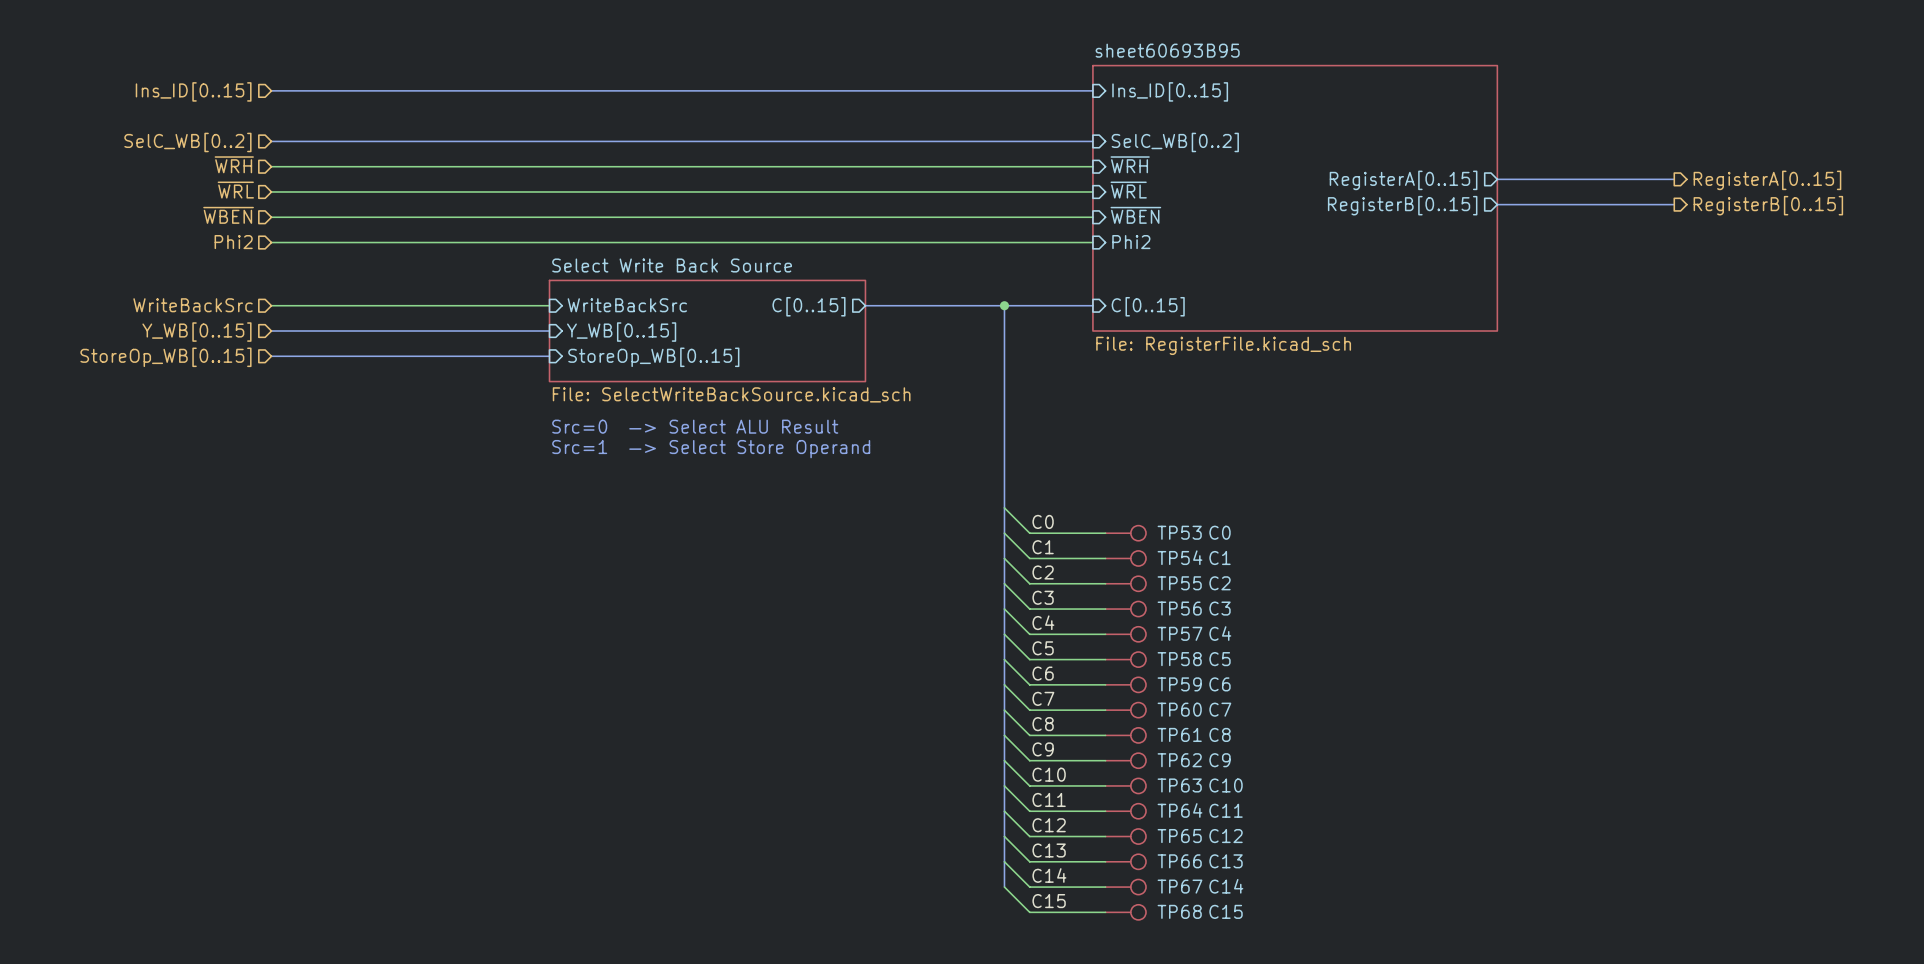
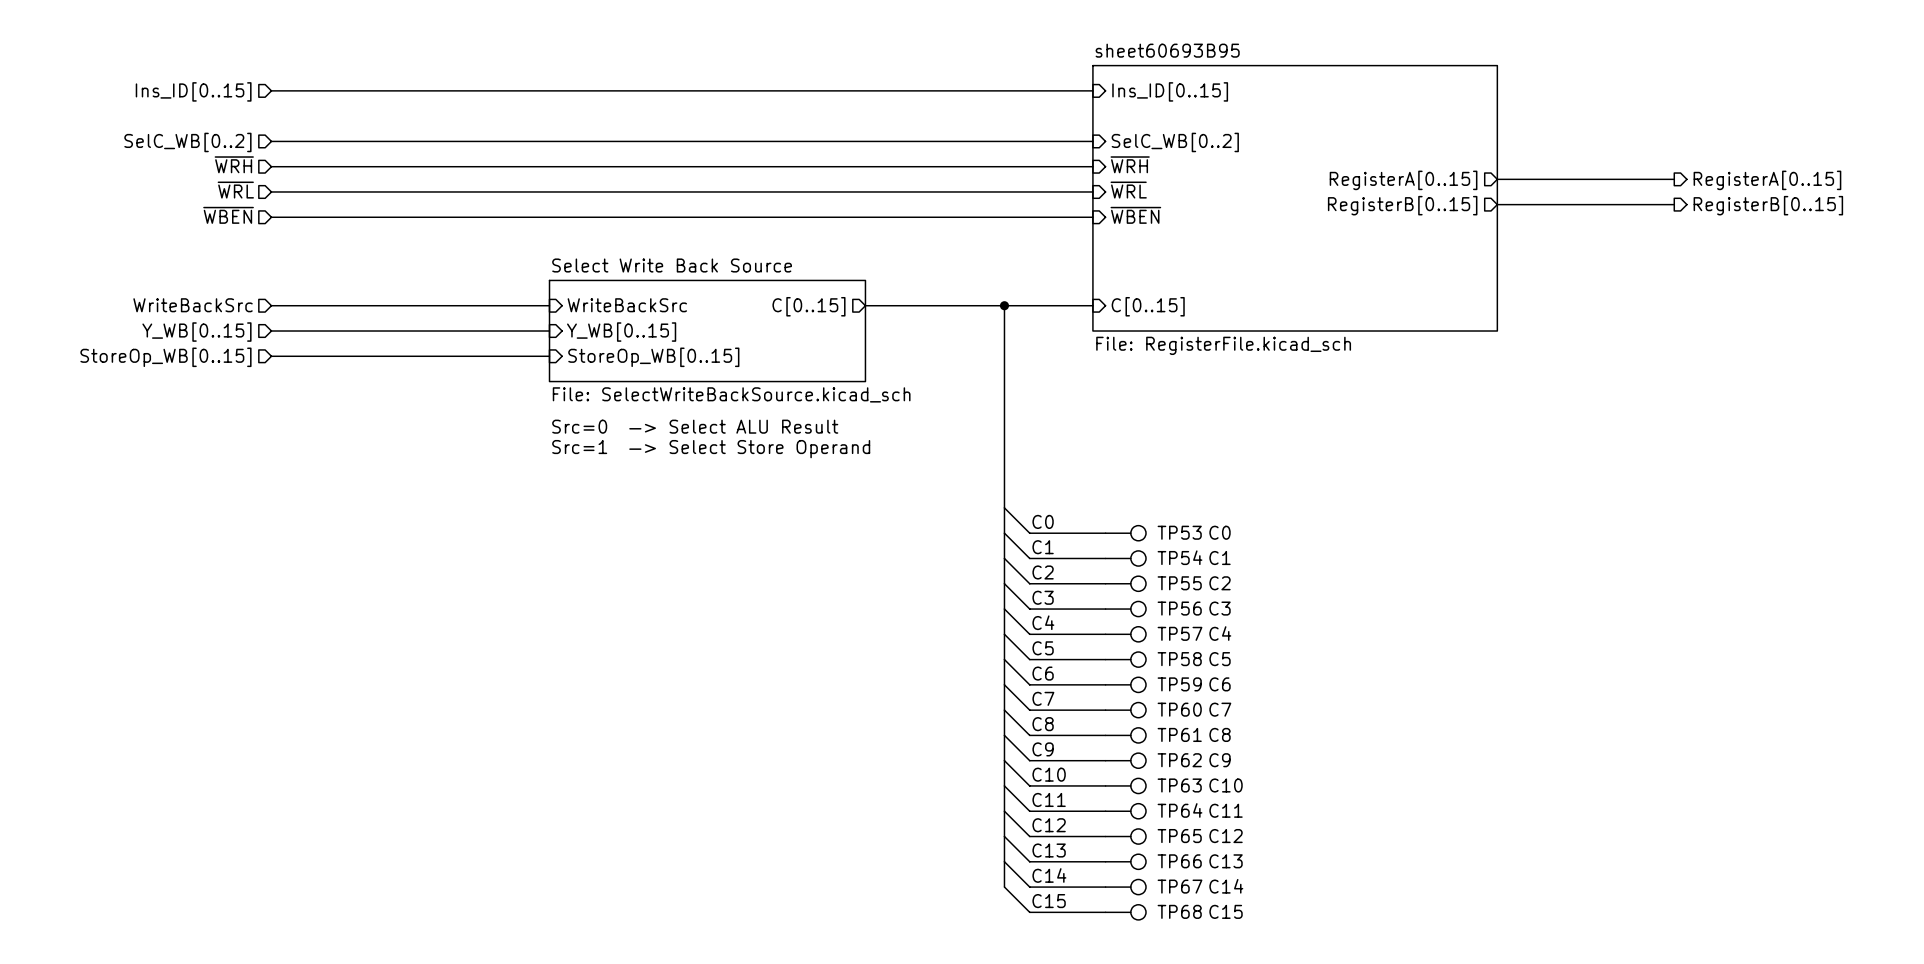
hierarchical label: Phi2 (233, 242) -> none
wire: (271, 242) (1092, 242) -> none
sheet pin: Phi2 (1131, 242) -> none

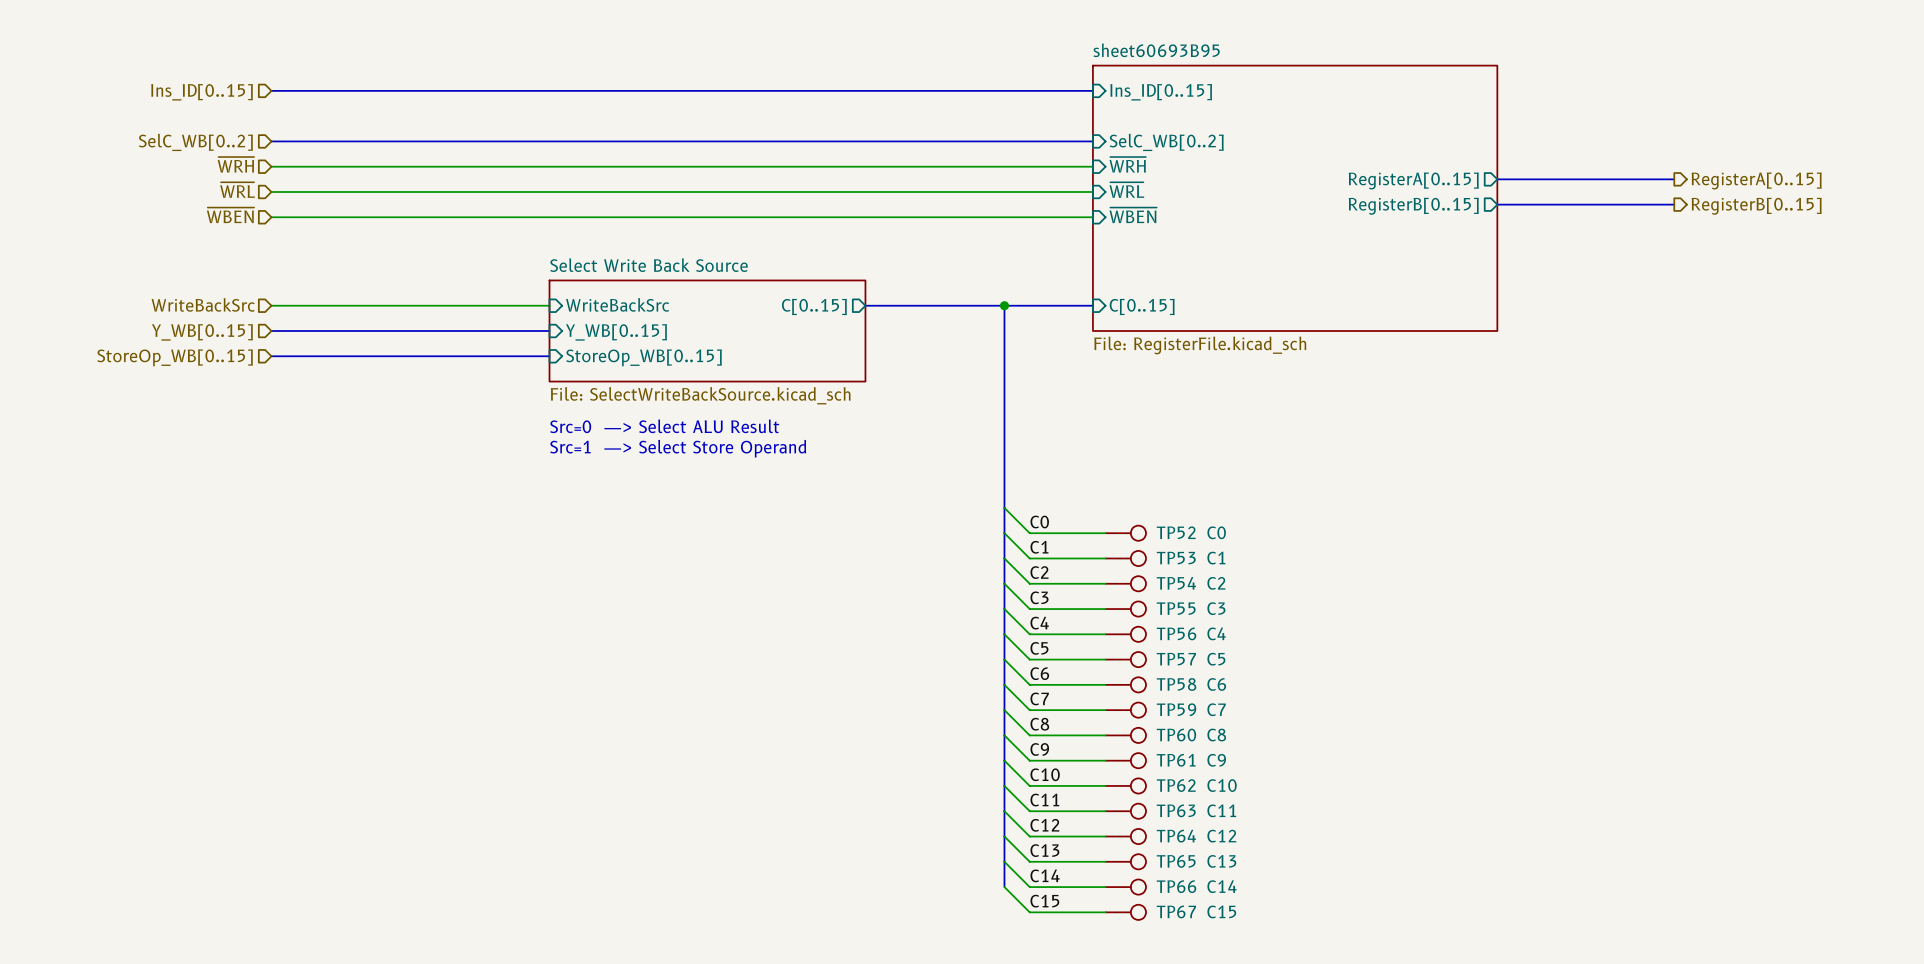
TP53 name: TP53 (1179, 532) -> TP52 (1176, 532)
TP54 name: TP54 (1179, 557) -> TP53 (1176, 558)
TP55 name: TP55 (1179, 583) -> TP54 (1176, 583)
TP56 name: TP56 (1179, 608) -> TP55 (1176, 608)
TP57 name: TP57 (1179, 633) -> TP56 (1176, 633)
TP58 name: TP58 (1179, 659) -> TP57 (1176, 659)
TP59 name: TP59 (1179, 684) -> TP58 (1176, 684)
TP60 name: TP60 (1179, 709) -> TP59 (1176, 709)
TP61 name: TP61 (1179, 734) -> TP60 (1176, 735)
TP62 name: TP62 (1179, 760) -> TP61 (1176, 760)
TP63 name: TP63 (1179, 785) -> TP62 (1176, 785)
TP64 name: TP64 (1179, 810) -> TP63 (1176, 810)
TP65 name: TP65 (1179, 836) -> TP64 (1176, 836)
TP66 name: TP66 (1179, 861) -> TP65 (1176, 861)
TP67 name: TP67 (1179, 886) -> TP66 (1176, 886)
TP68 name: TP68 (1179, 911) -> TP67 (1176, 911)

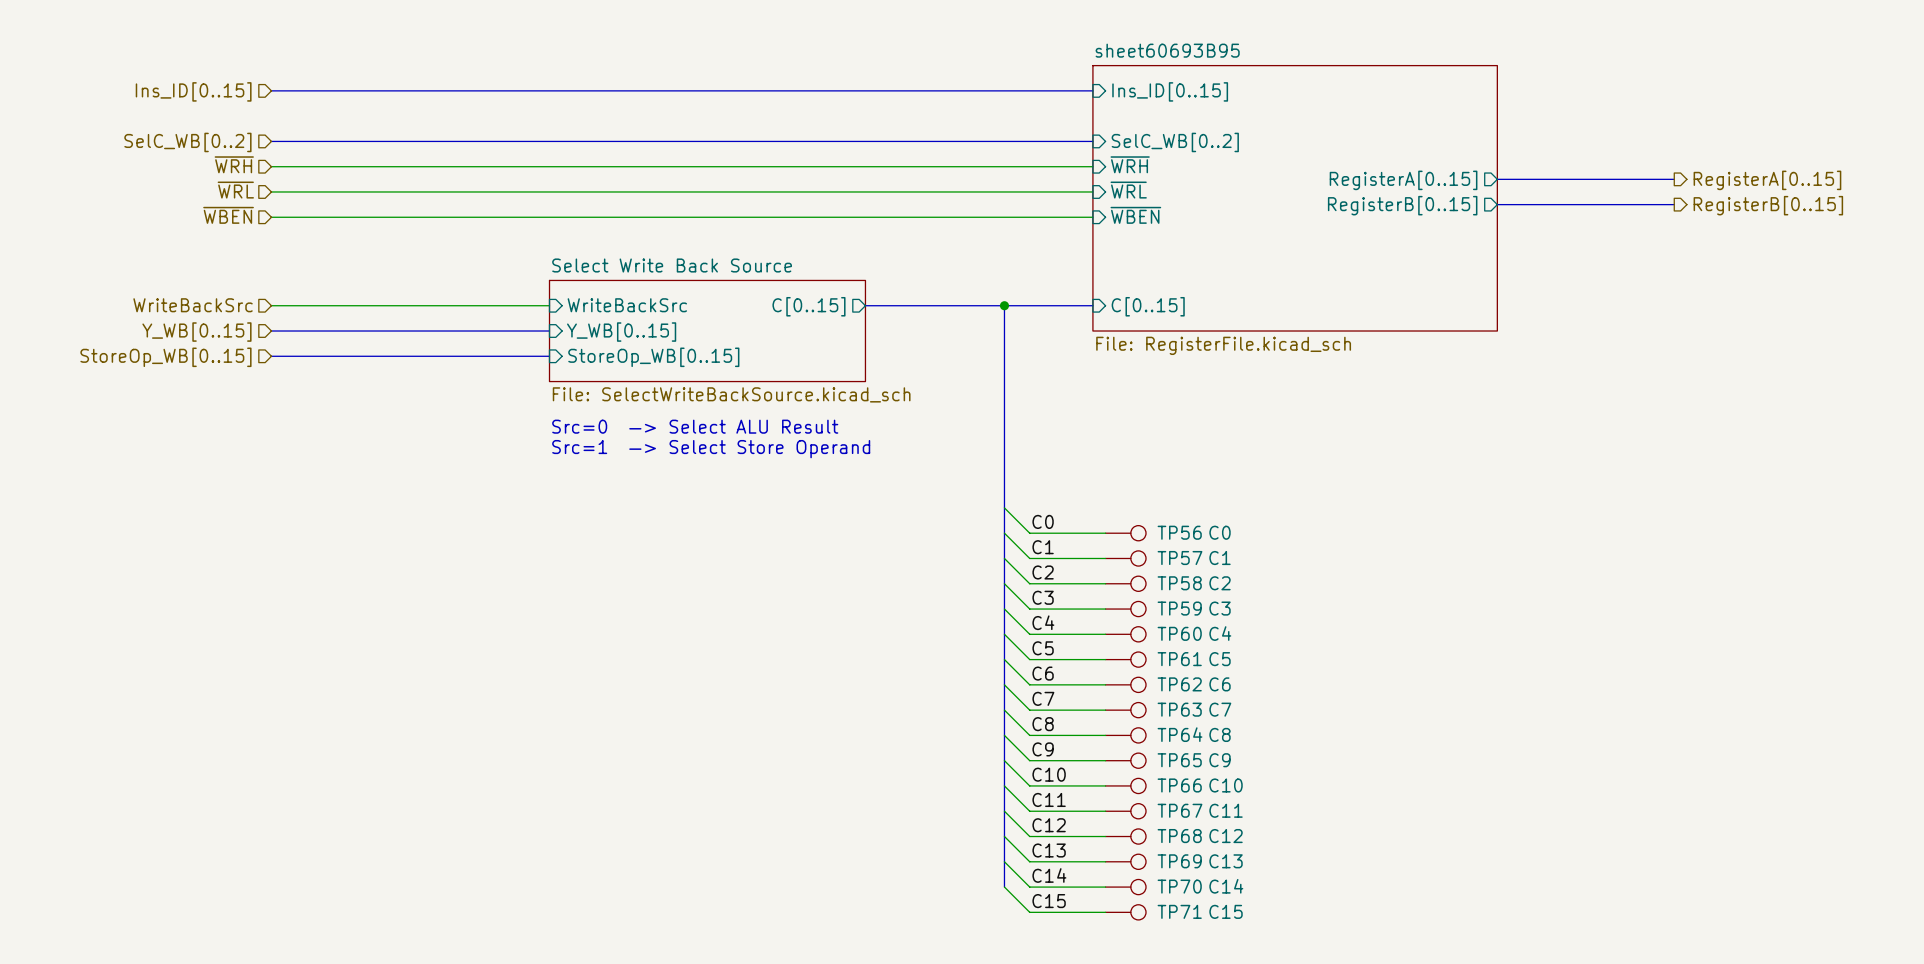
TP52 name: TP52 (1176, 532) -> TP56 (1179, 532)
TP53 name: TP53 (1176, 558) -> TP57 (1179, 558)
TP54 name: TP54 (1176, 583) -> TP58 (1179, 583)
TP55 name: TP55 (1176, 608) -> TP59 (1179, 608)
TP56 name: TP56 (1176, 633) -> TP60 (1179, 633)
TP57 name: TP57 (1176, 659) -> TP61 (1179, 659)
TP58 name: TP58 (1176, 684) -> TP62 (1179, 684)
TP59 name: TP59 (1176, 709) -> TP63 (1179, 709)
TP60 name: TP60 (1176, 735) -> TP64 (1179, 734)
TP61 name: TP61 (1176, 760) -> TP65 (1179, 760)
TP62 name: TP62 (1176, 785) -> TP66 (1179, 785)
TP63 name: TP63 (1176, 810) -> TP67 (1179, 810)
TP64 name: TP64 (1176, 836) -> TP68 (1179, 836)
TP65 name: TP65 (1176, 861) -> TP69 (1179, 861)
TP66 name: TP66 (1176, 886) -> TP70 (1179, 886)
TP67 name: TP67 (1176, 911) -> TP71 (1179, 911)

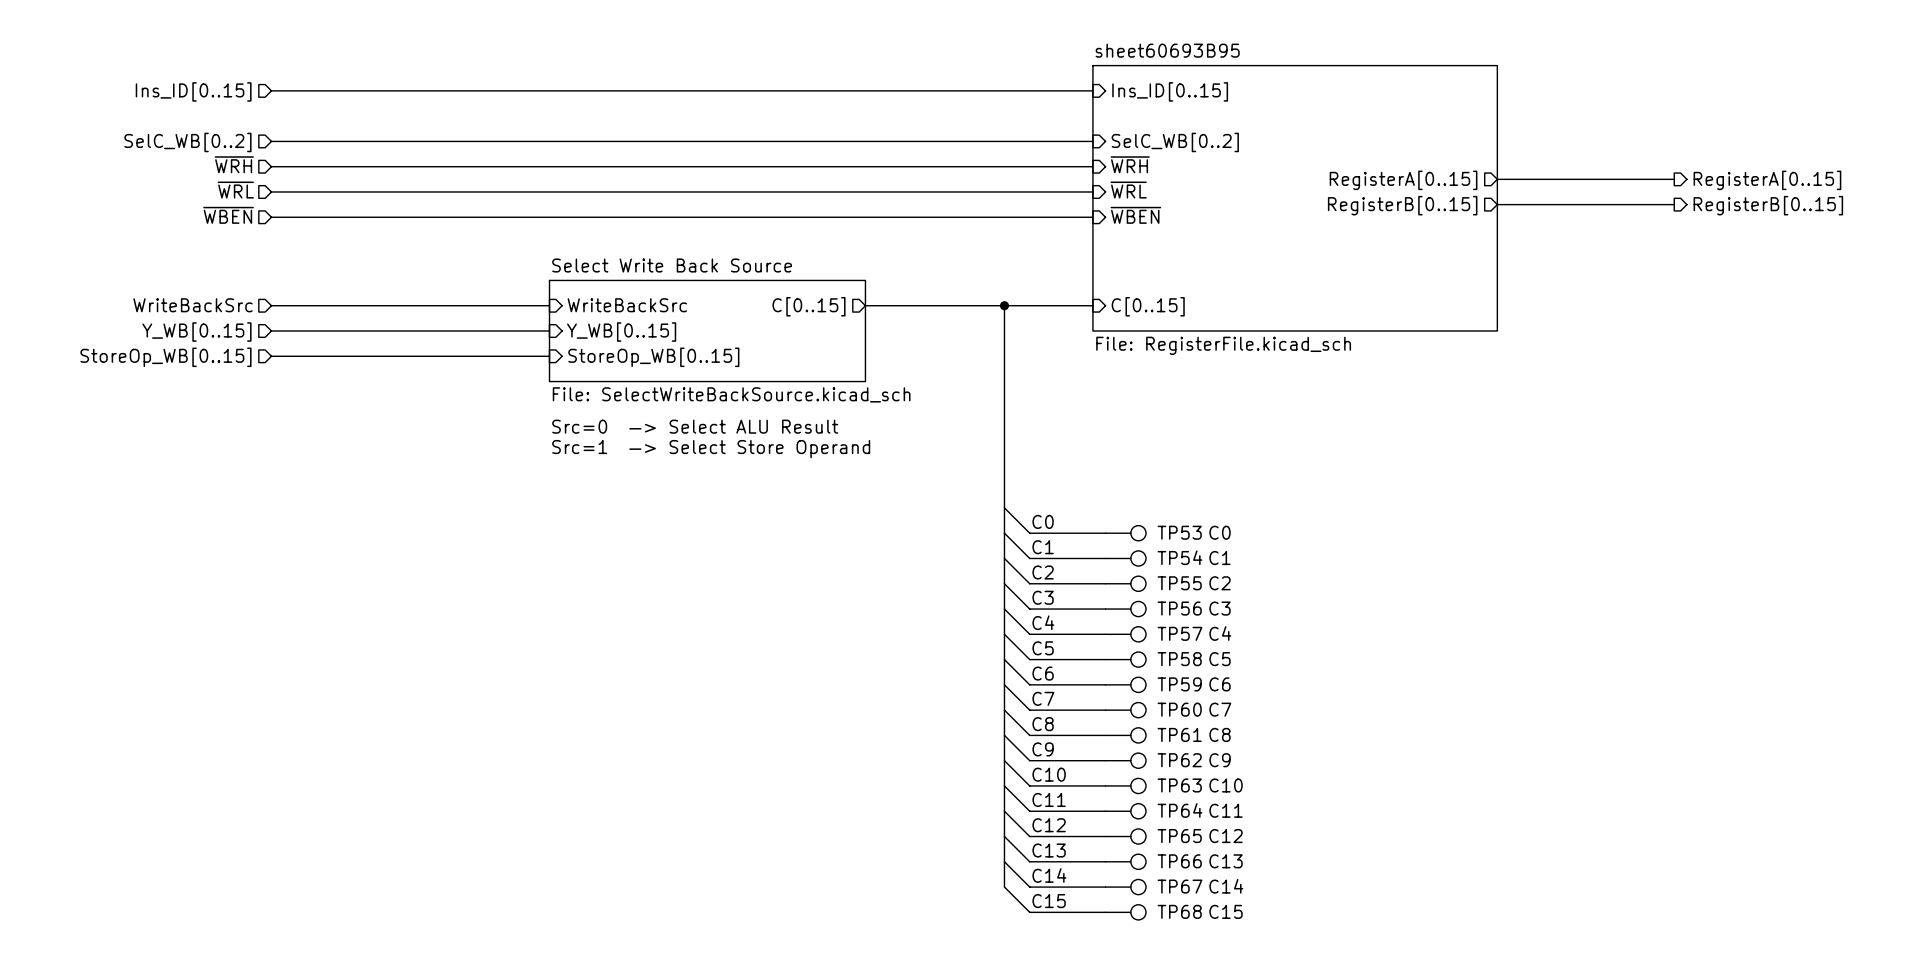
TP56 name: TP56 (1179, 532) -> TP53 (1179, 532)
TP57 name: TP57 (1179, 558) -> TP54 (1179, 557)
TP58 name: TP58 (1179, 583) -> TP55 (1179, 583)
TP59 name: TP59 (1179, 608) -> TP56 (1179, 608)
TP60 name: TP60 (1179, 633) -> TP57 (1179, 633)
TP61 name: TP61 (1179, 659) -> TP58 (1179, 659)
TP62 name: TP62 (1179, 684) -> TP59 (1179, 684)
TP63 name: TP63 (1179, 709) -> TP60 (1179, 709)
TP64 name: TP64 (1179, 734) -> TP61 (1179, 734)
TP65 name: TP65 (1179, 760) -> TP62 (1179, 760)
TP66 name: TP66 (1179, 785) -> TP63 (1179, 785)
TP67 name: TP67 (1179, 810) -> TP64 (1179, 810)
TP68 name: TP68 (1179, 836) -> TP65 (1179, 836)
TP69 name: TP69 (1179, 861) -> TP66 (1179, 861)
TP70 name: TP70 (1179, 886) -> TP67 (1179, 886)
TP71 name: TP71 (1179, 911) -> TP68 (1179, 911)

